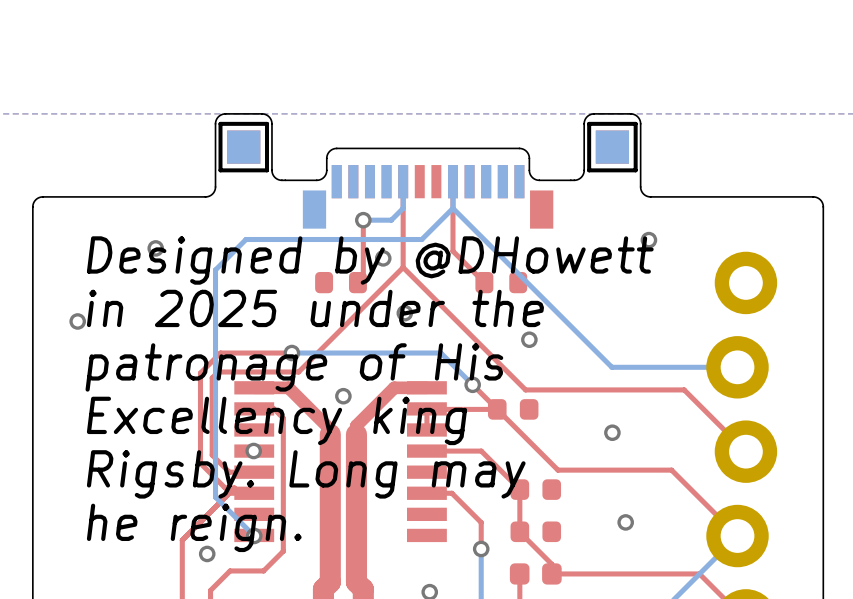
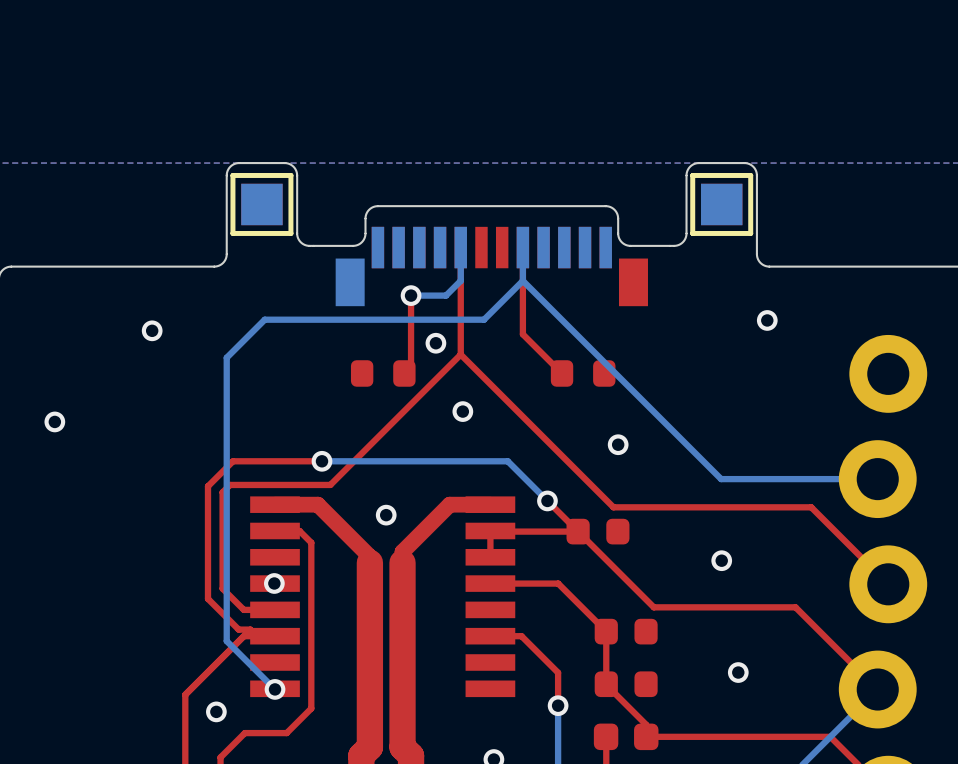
text: Designed by @DHowett (370, 260) -> none
text: in 2025 under the (315, 308) -> none
text: patronage of His (294, 367) -> none
text: Excellency king (276, 420) -> none
text: Rigsby. Long may (306, 474) -> none
text: he reign. (194, 527) -> none

